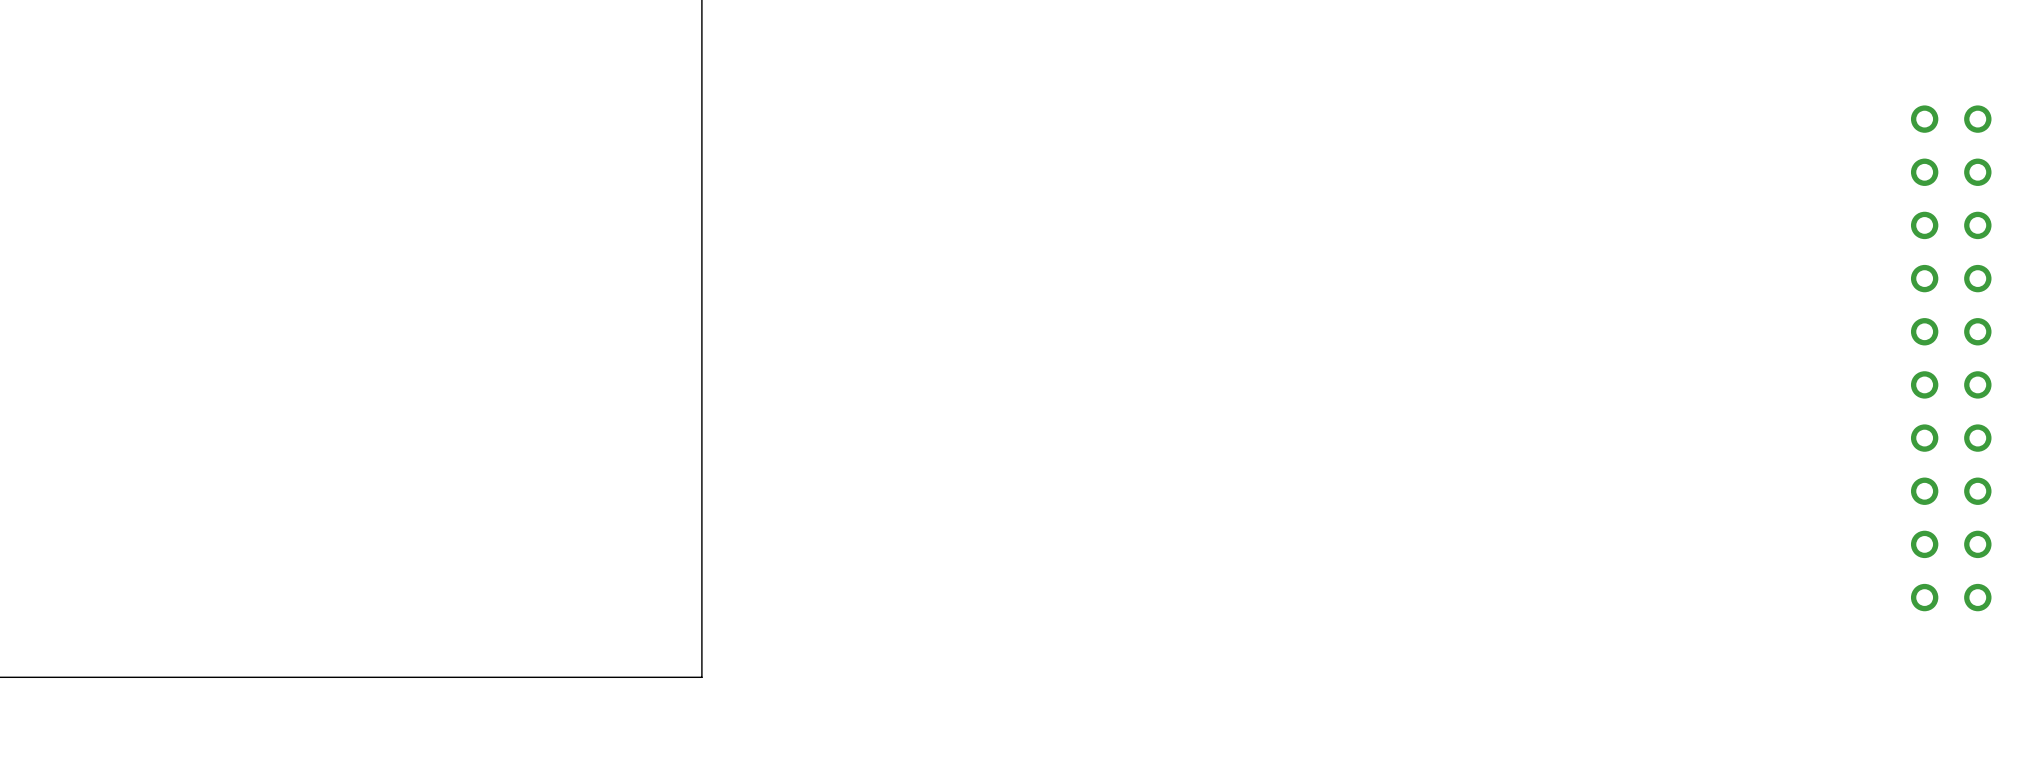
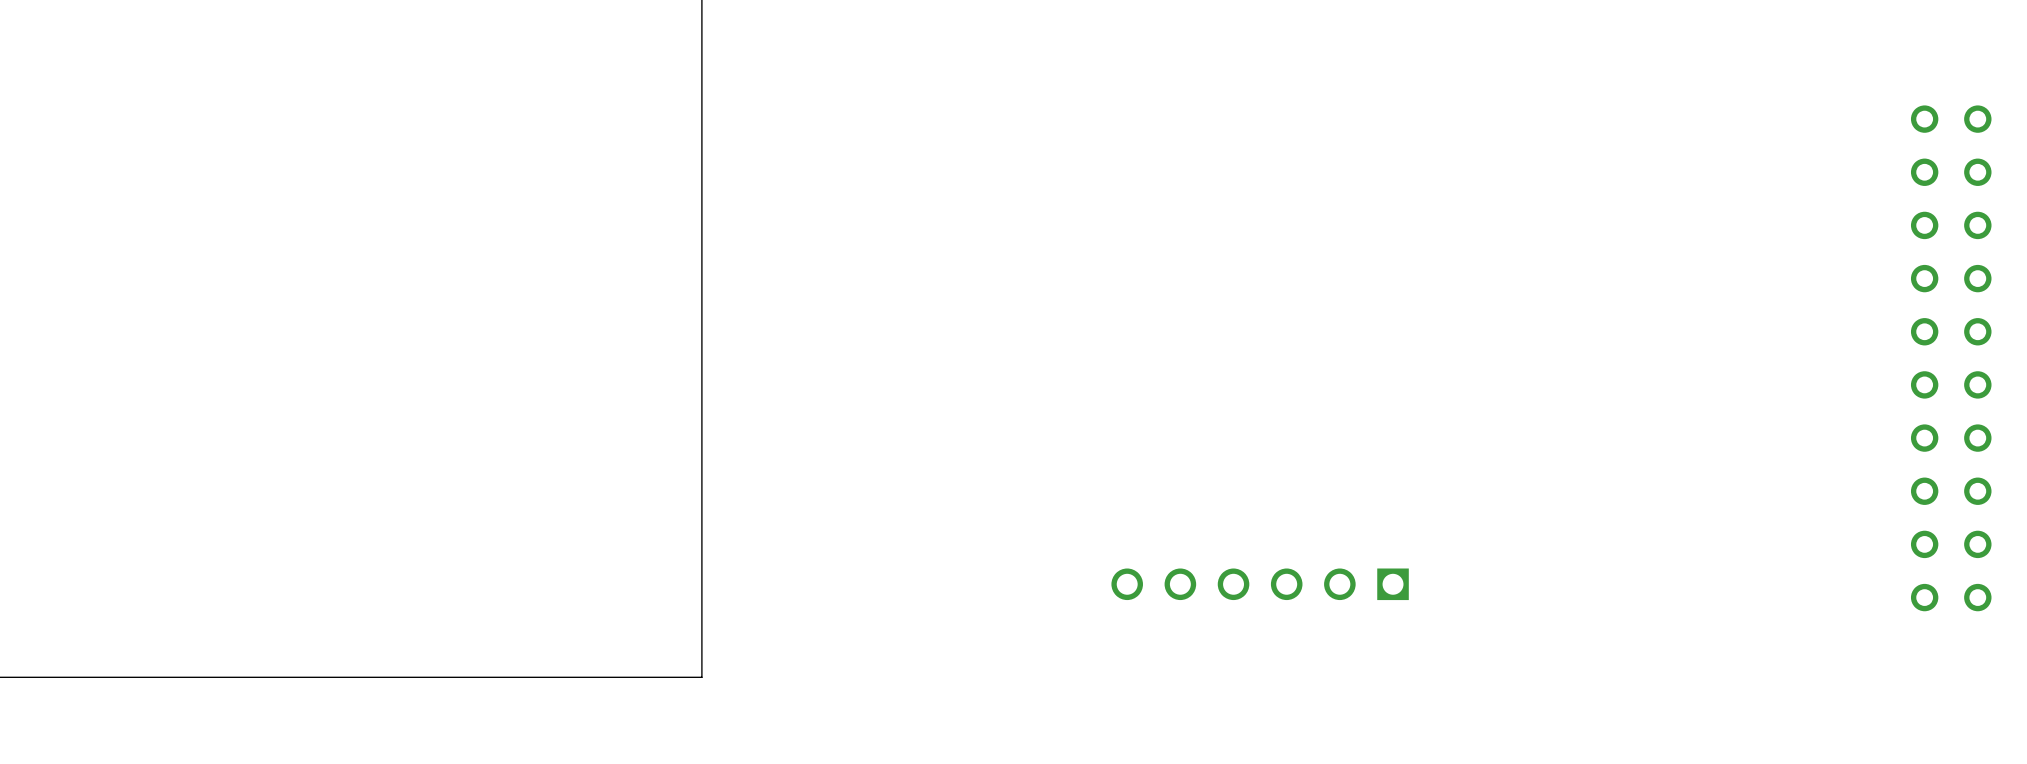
part: none -> (1260, 584)

